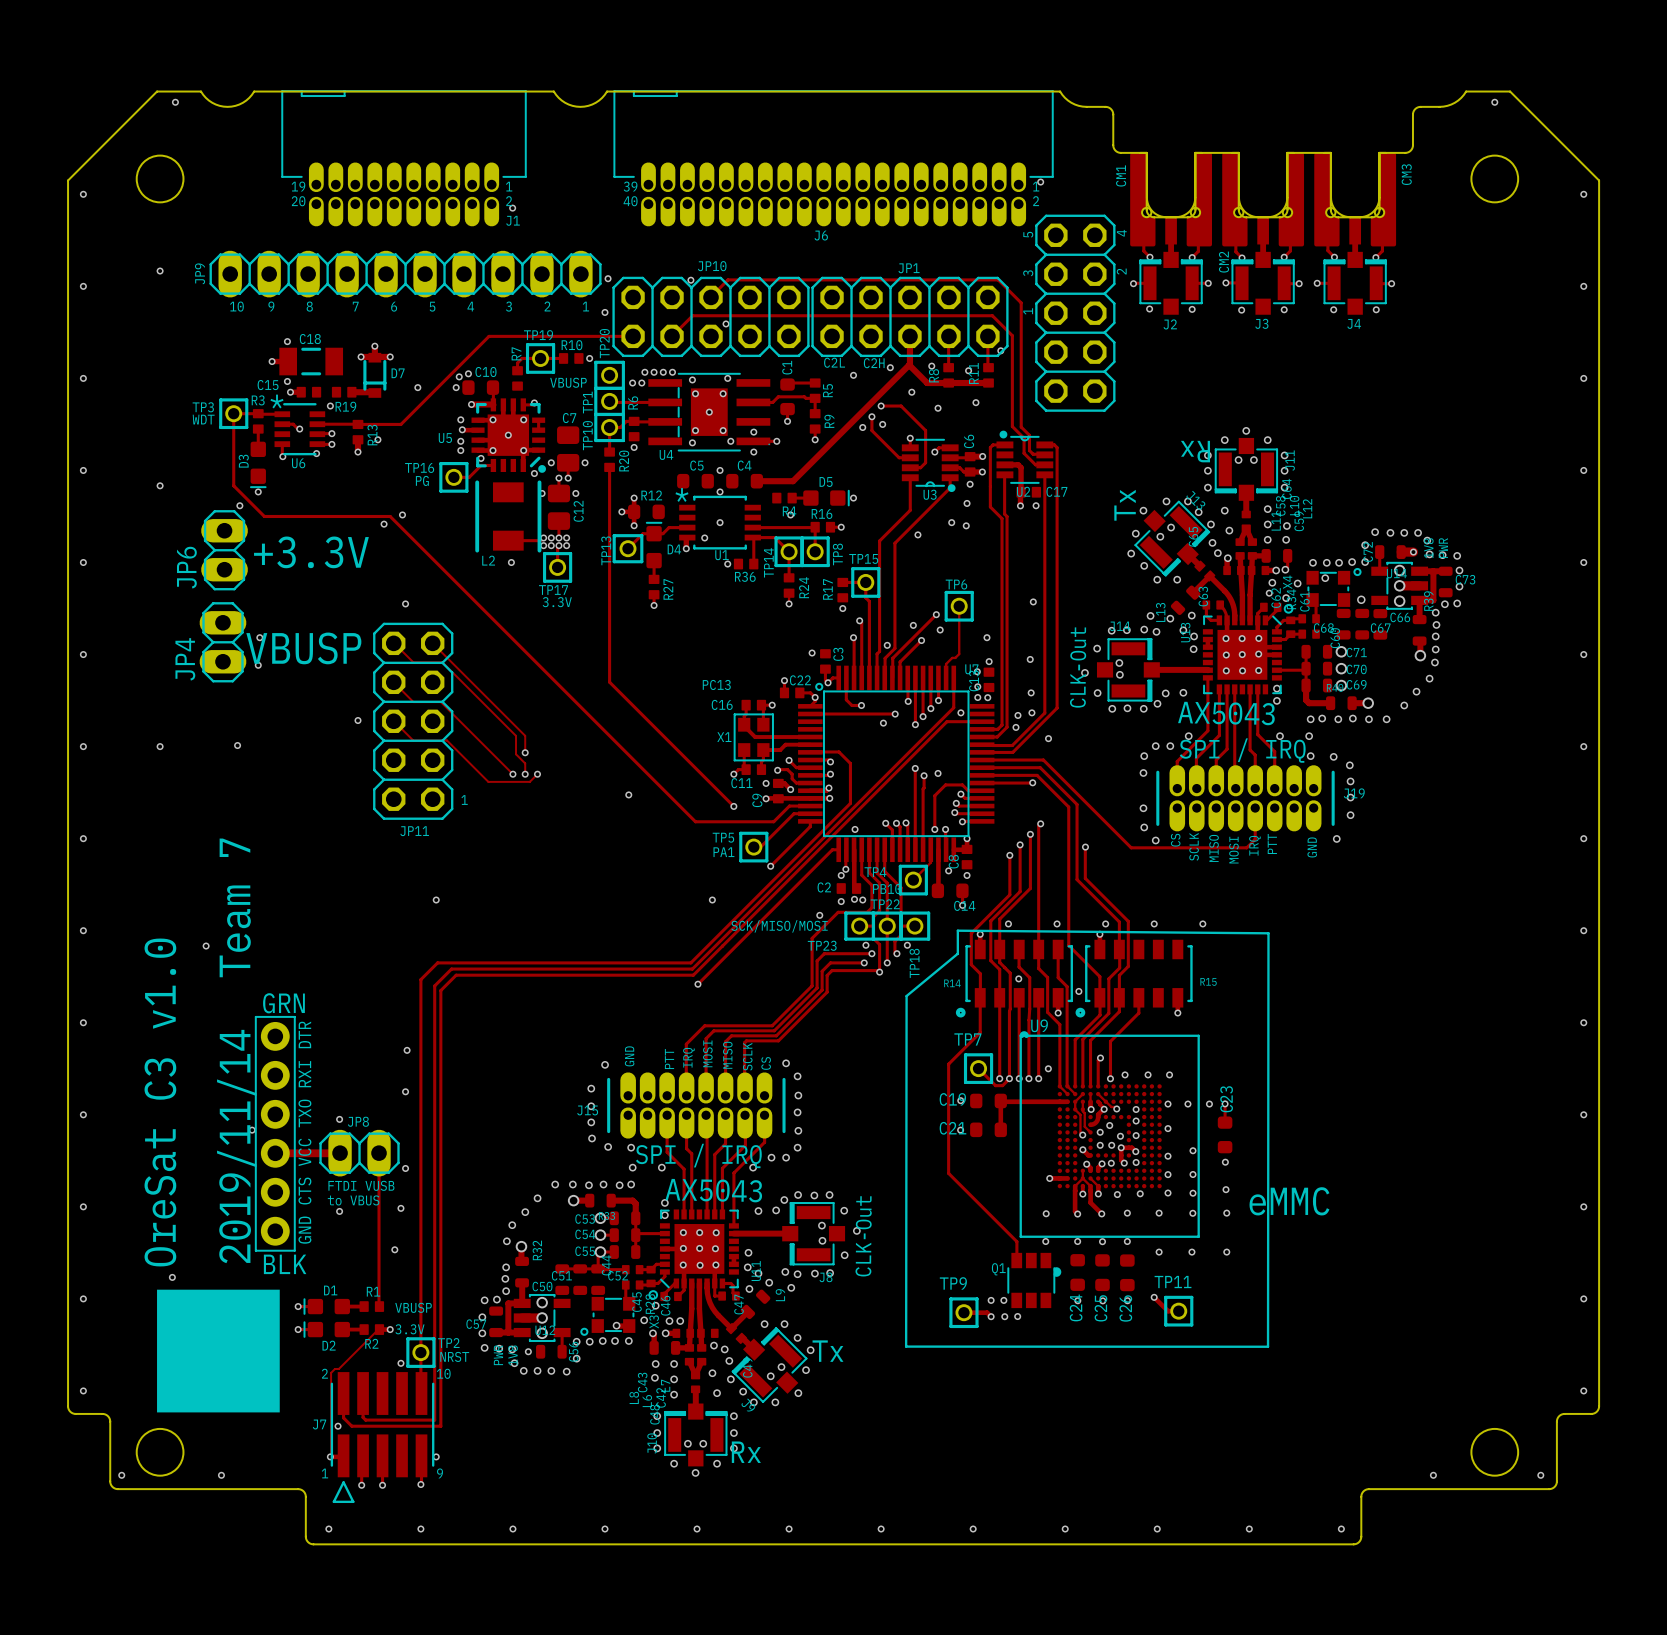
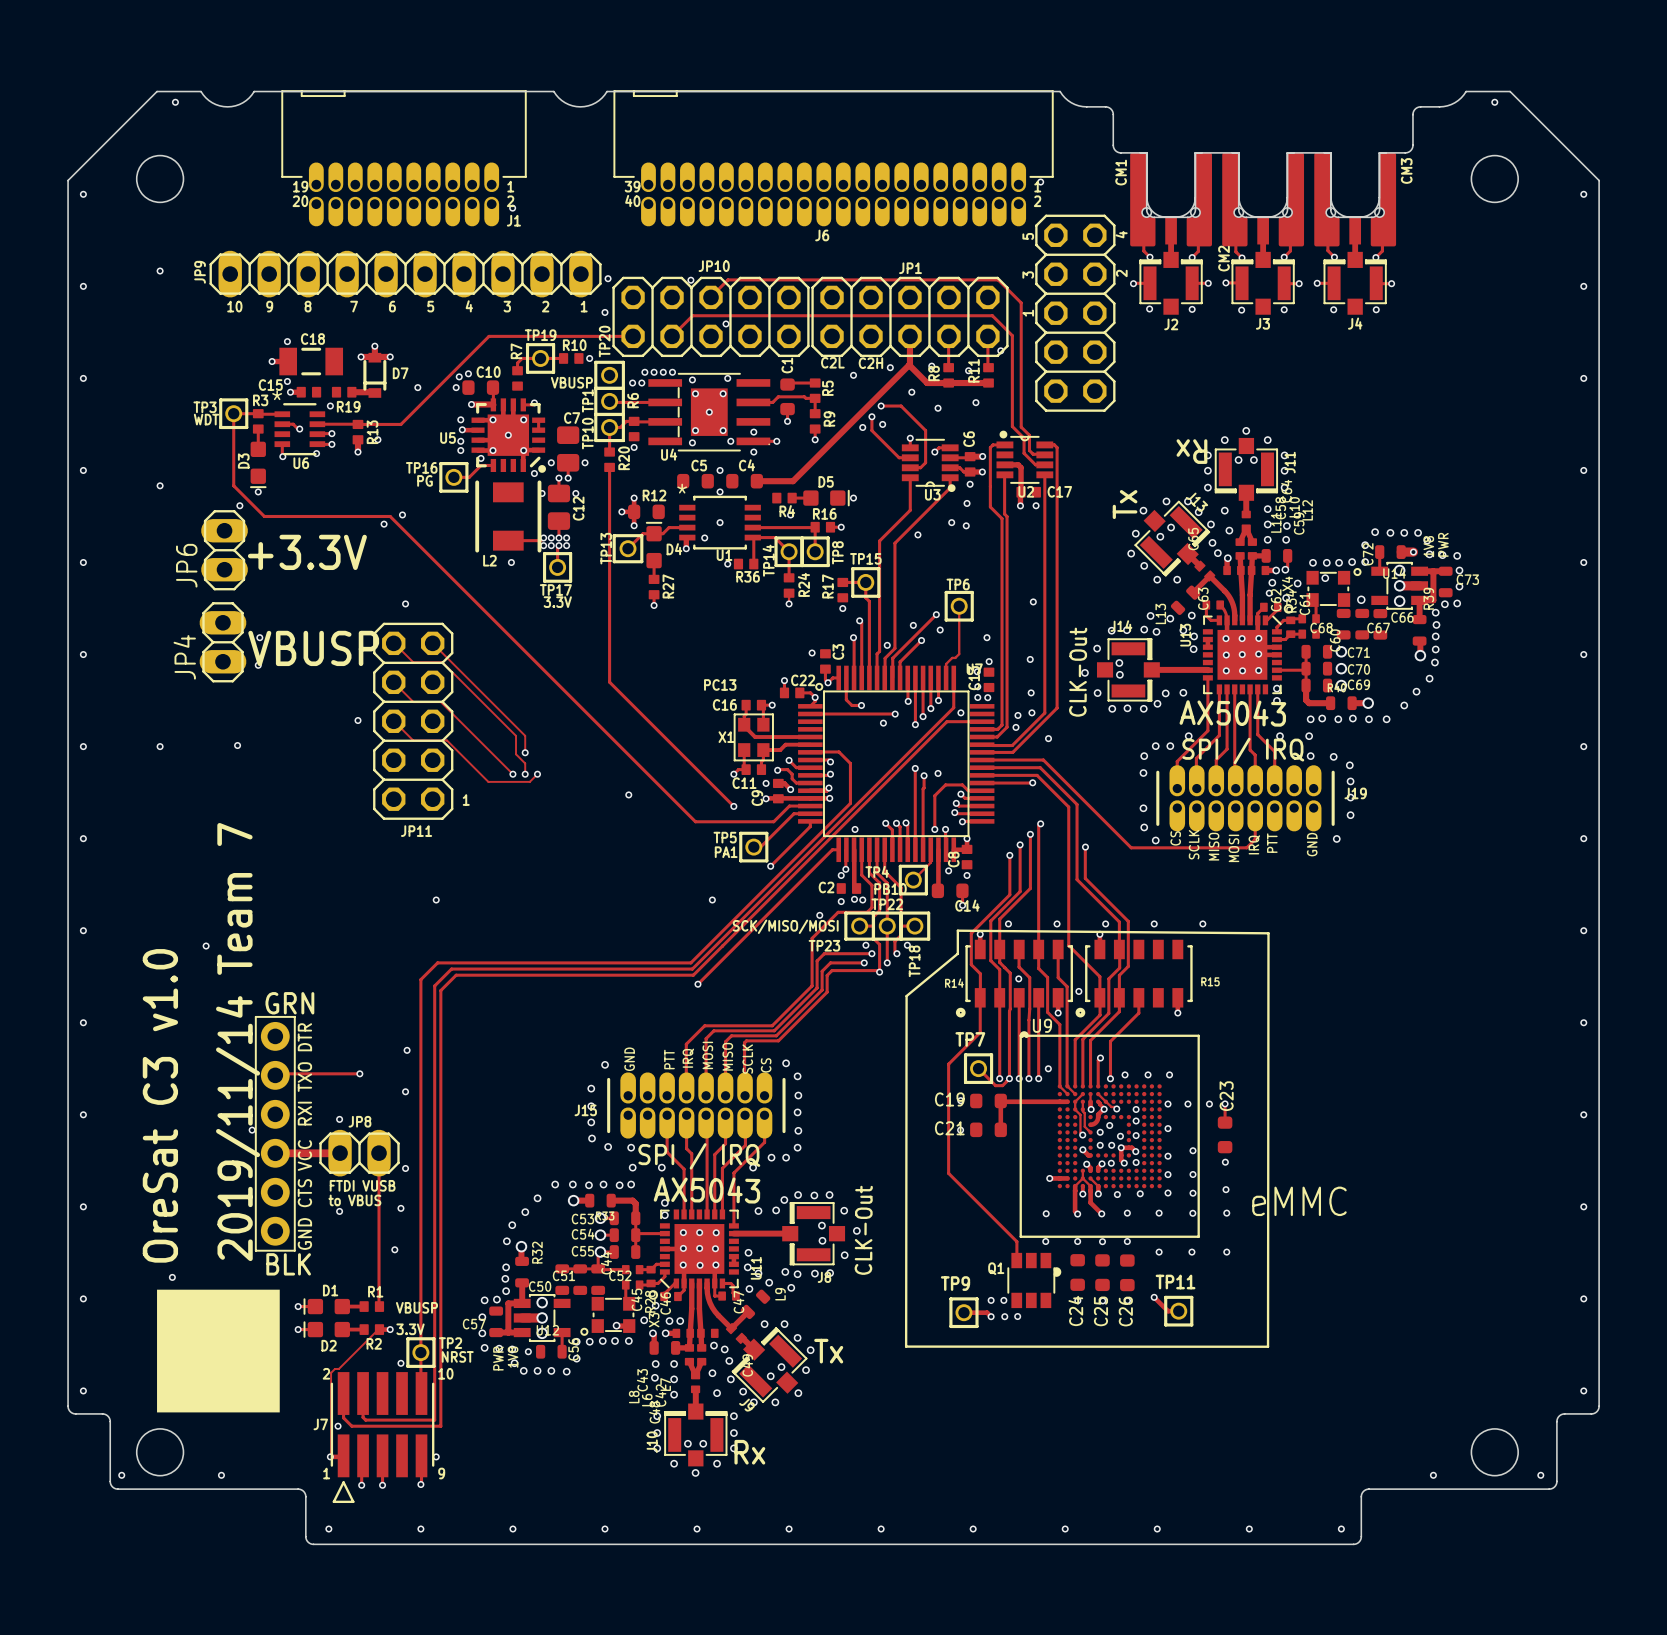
track: none -> (359, 1073) (275, 1074)
via: none -> (359, 1073)
part text: RXI (304, 1074) -> TXO (304, 1077)
part text: TXO (304, 1113) -> RXI (304, 1113)

